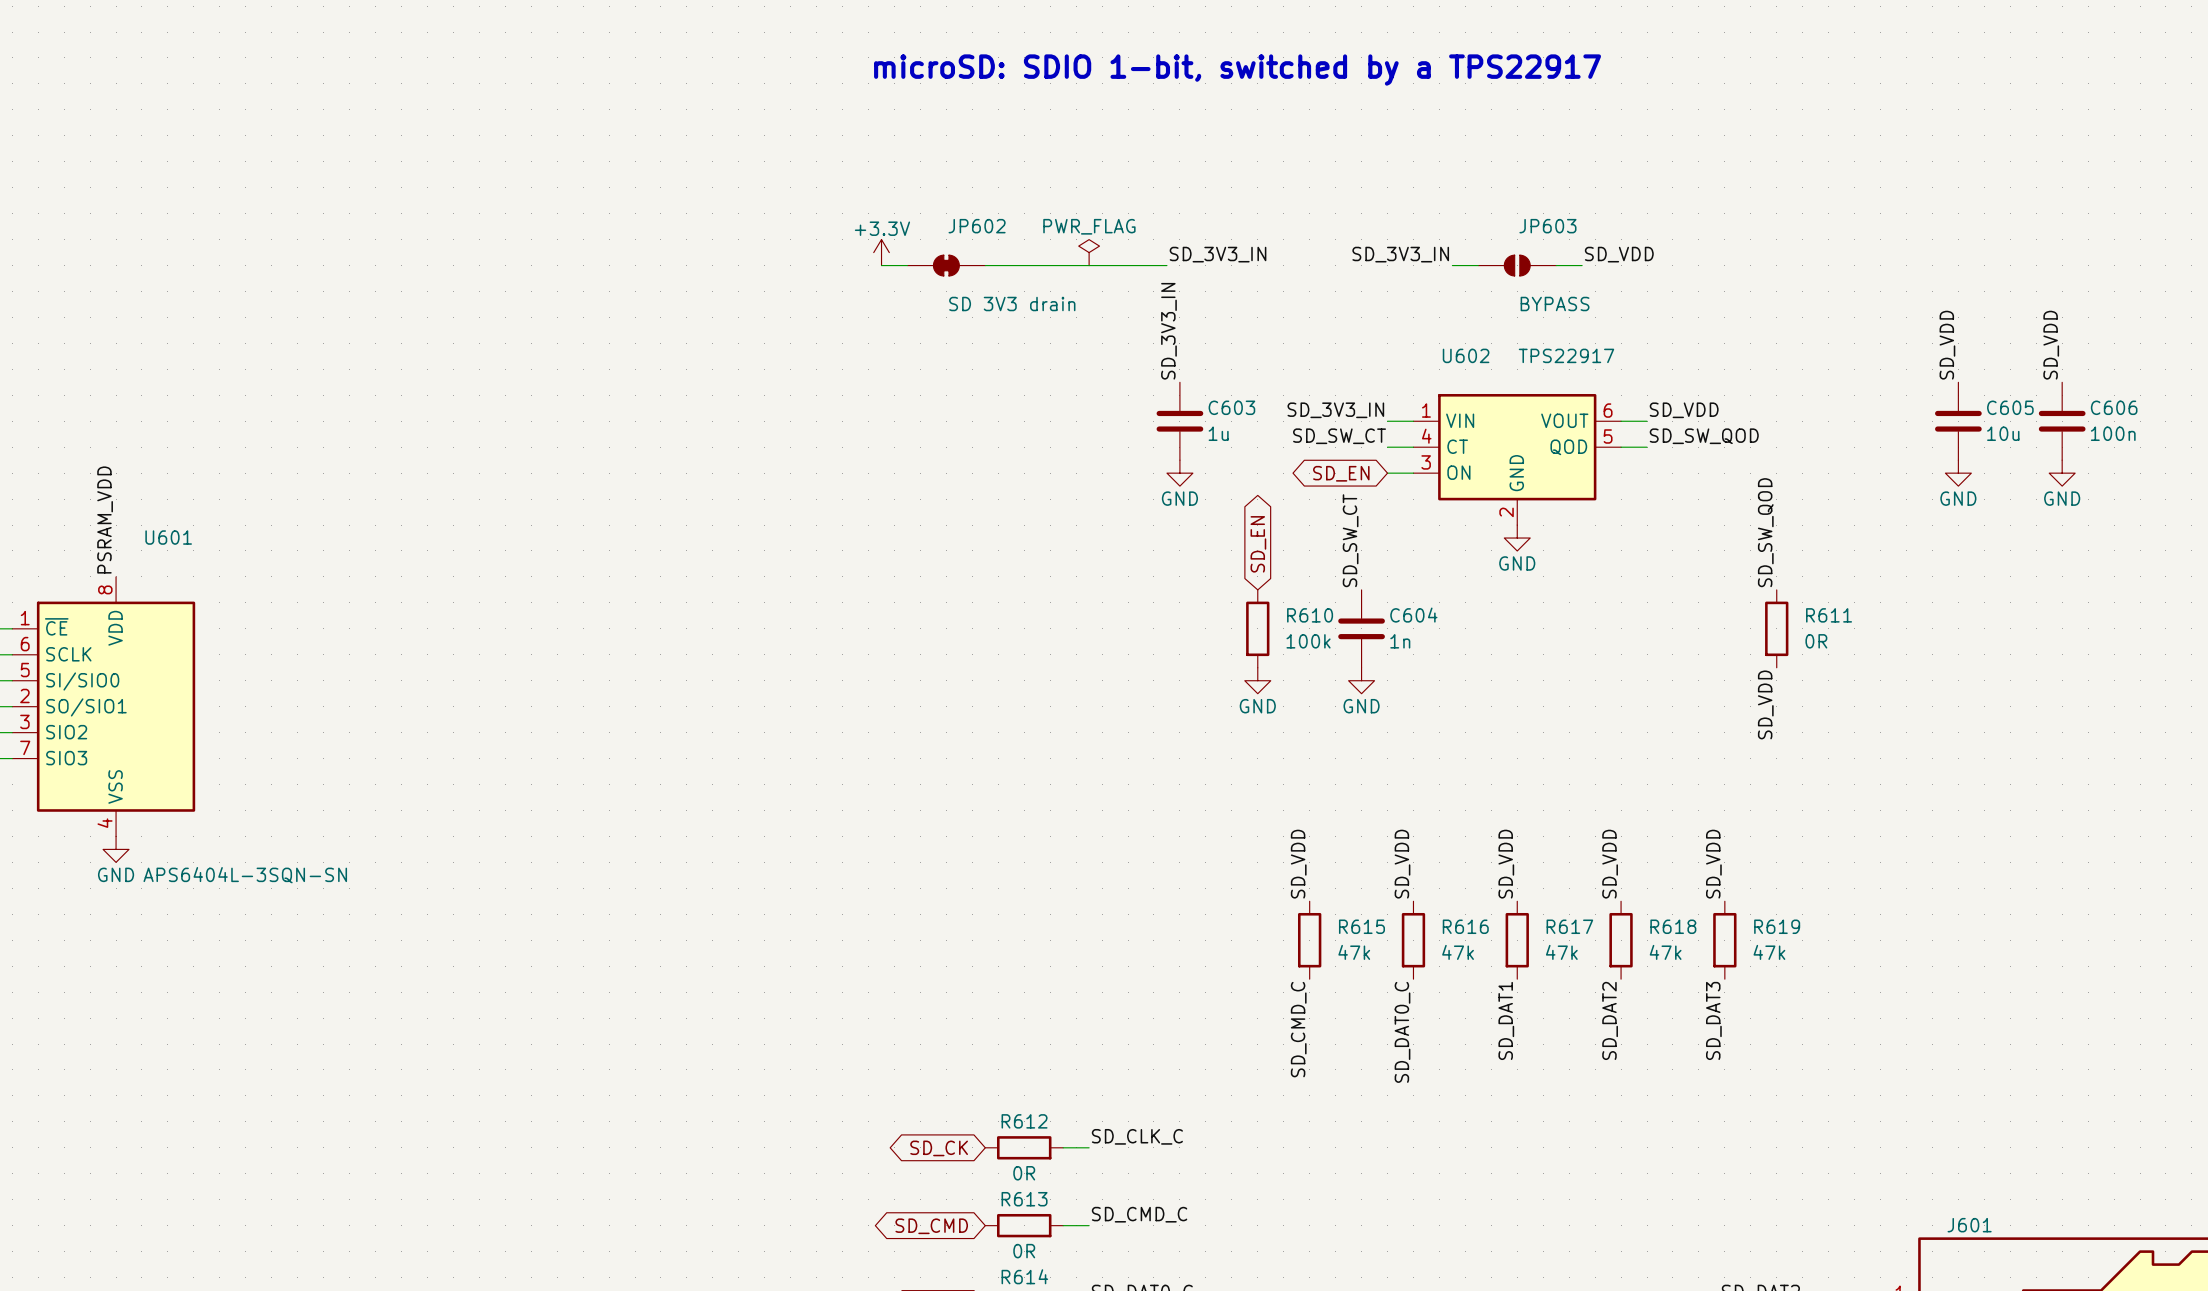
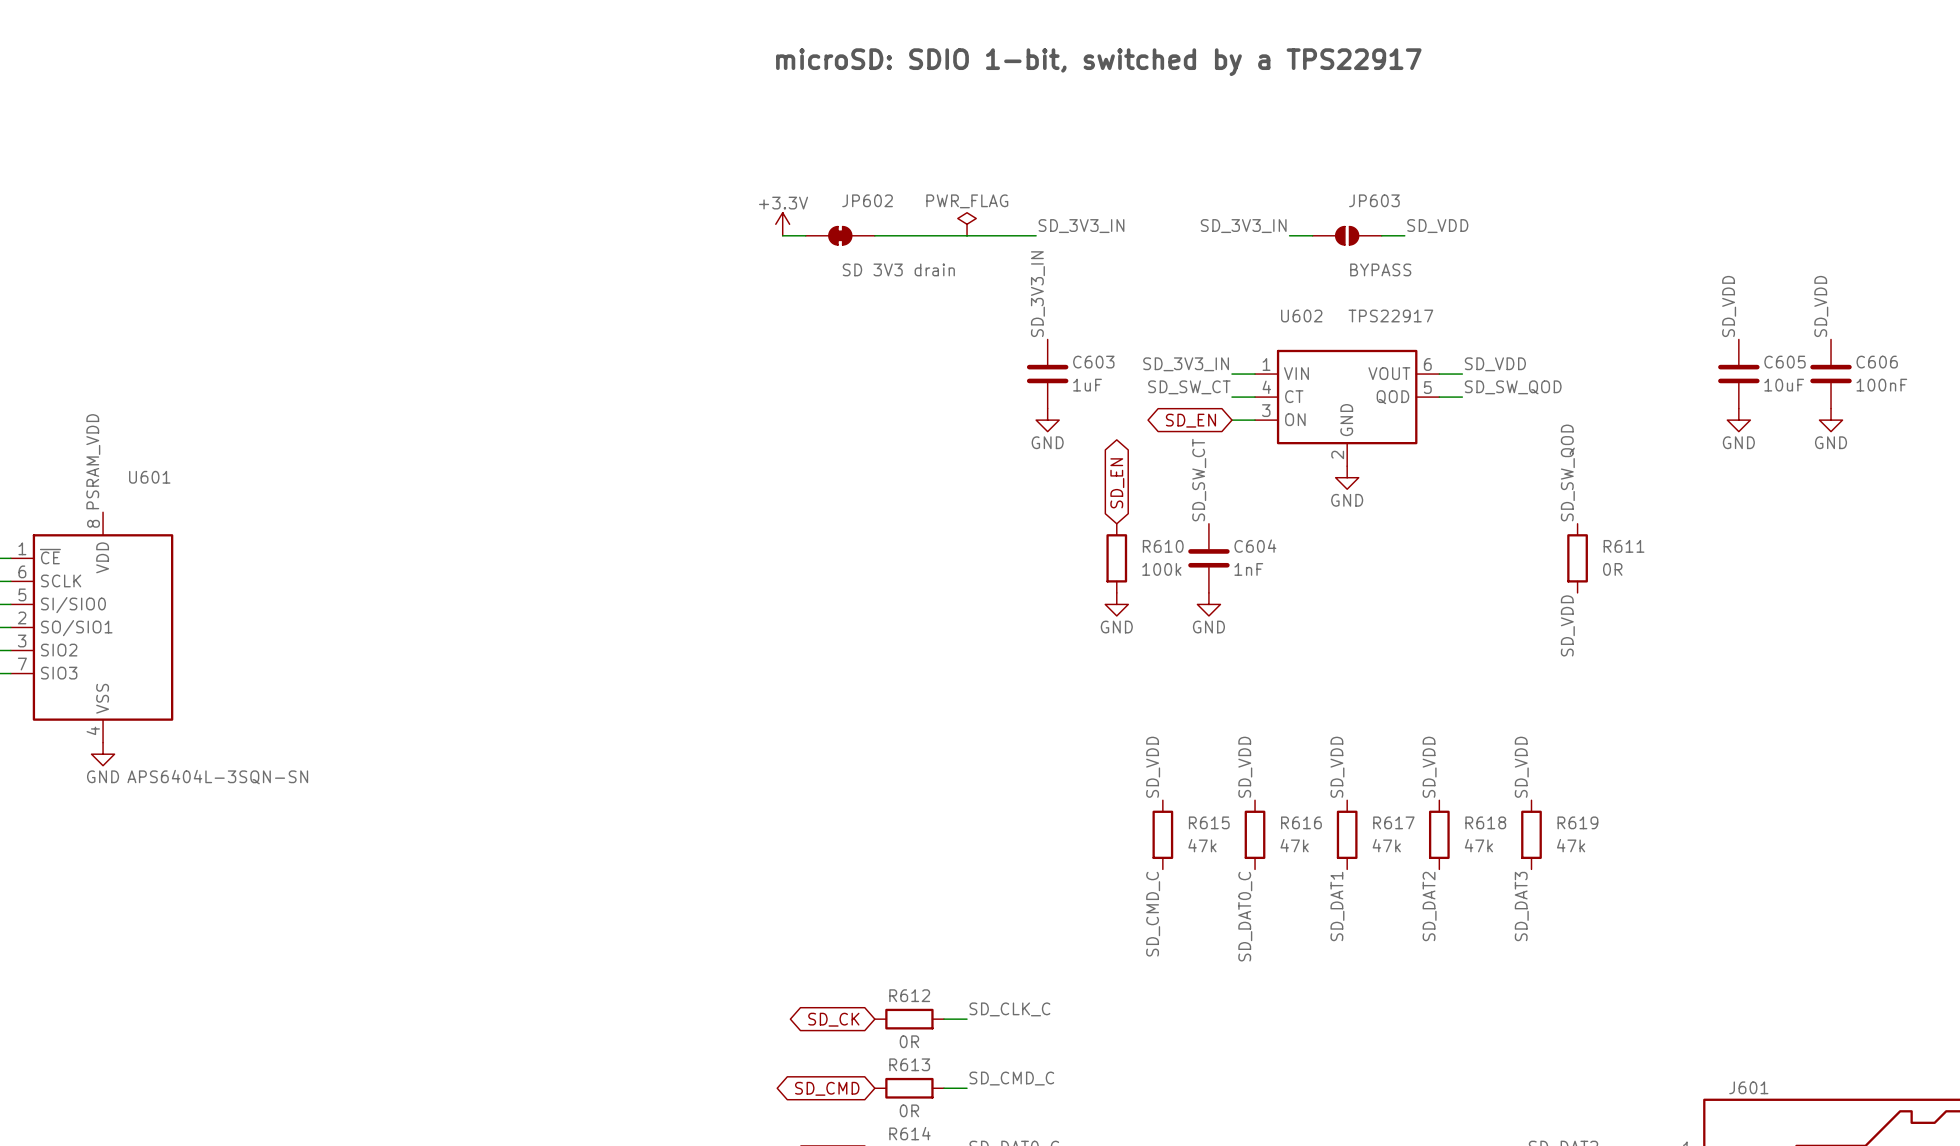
C603 value: 1u (1218, 433) -> 1uF (1087, 385)
C605 value: 10u (2003, 433) -> 10uF (1784, 385)
C606 value: 100n (2113, 433) -> 100nF (1881, 385)
C604 value: 1n (1400, 641) -> 1nF (1248, 569)

